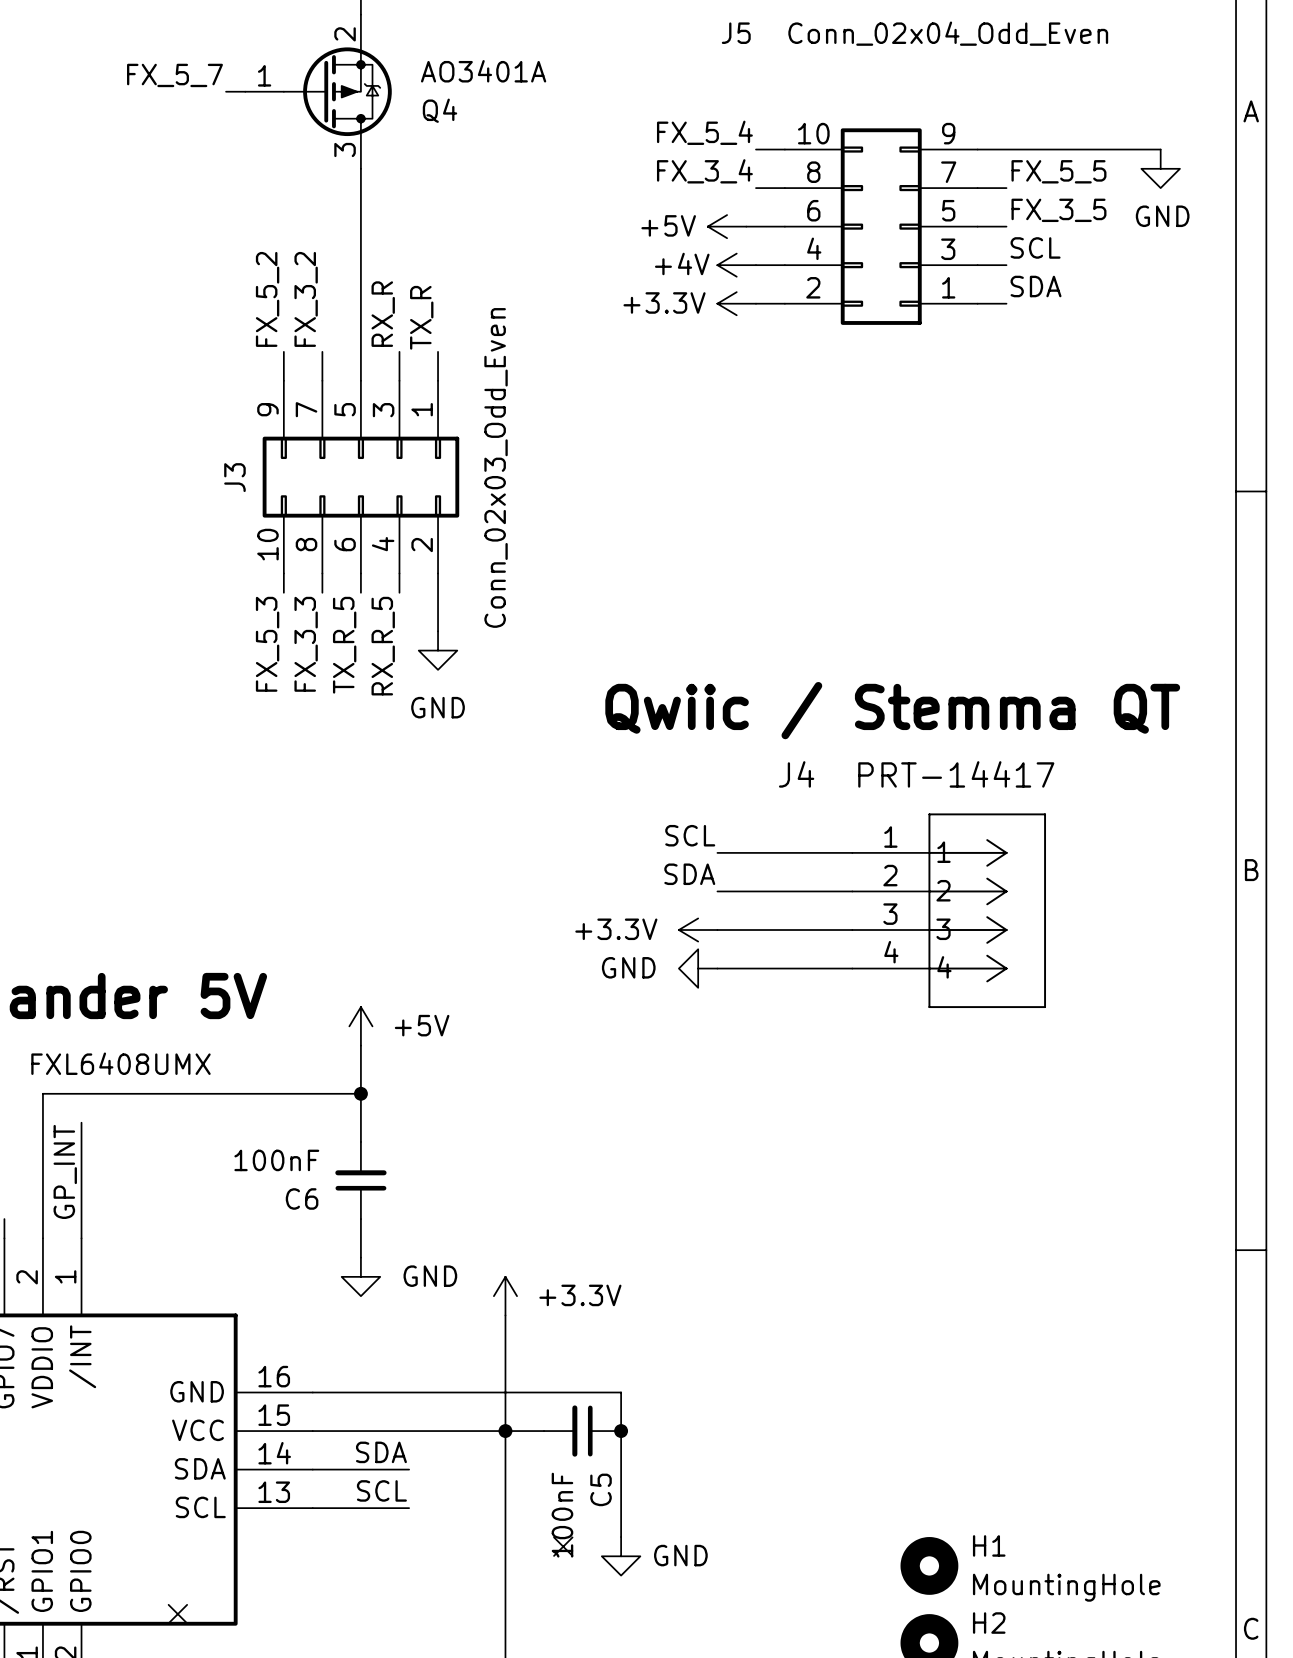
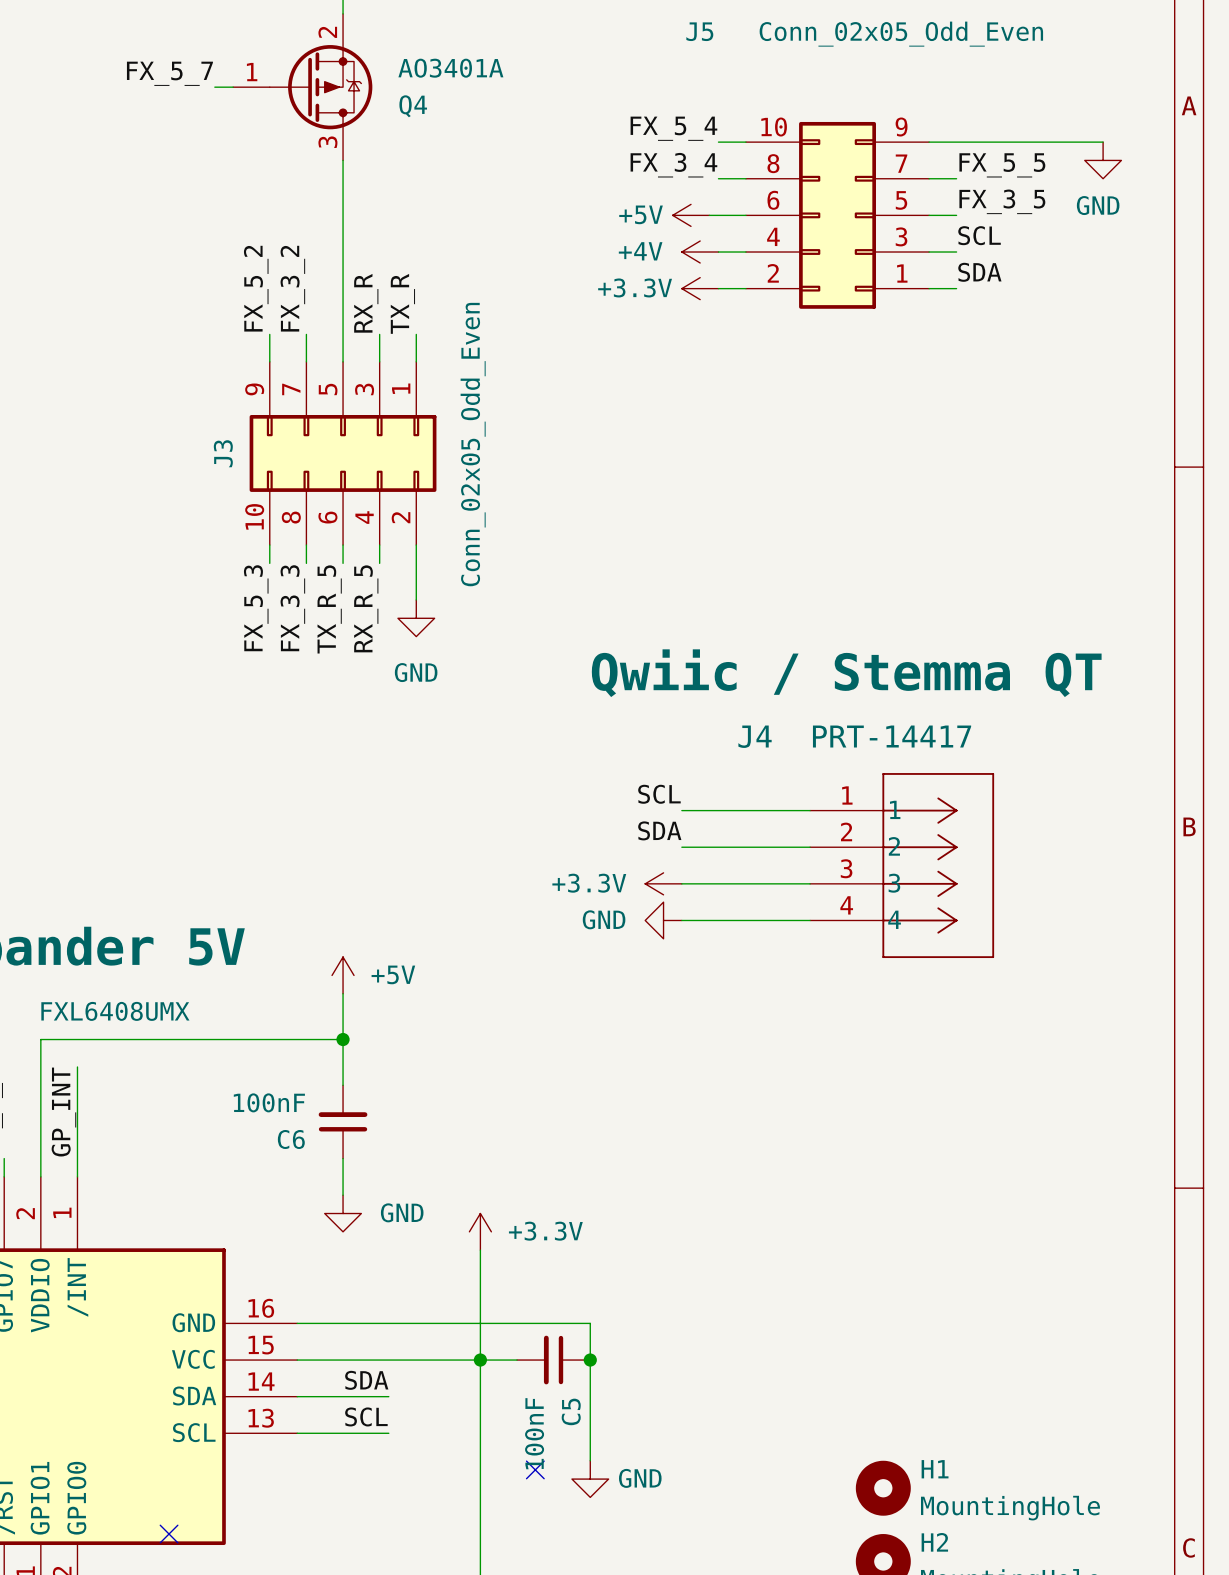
J5 value: Conn_02x04_Odd_Even (948, 33) -> Conn_02x05_Odd_Even (901, 34)
J3 value: Conn_02x03_Odd_Even (496, 467) -> Conn_02x05_Odd_Even (473, 444)

